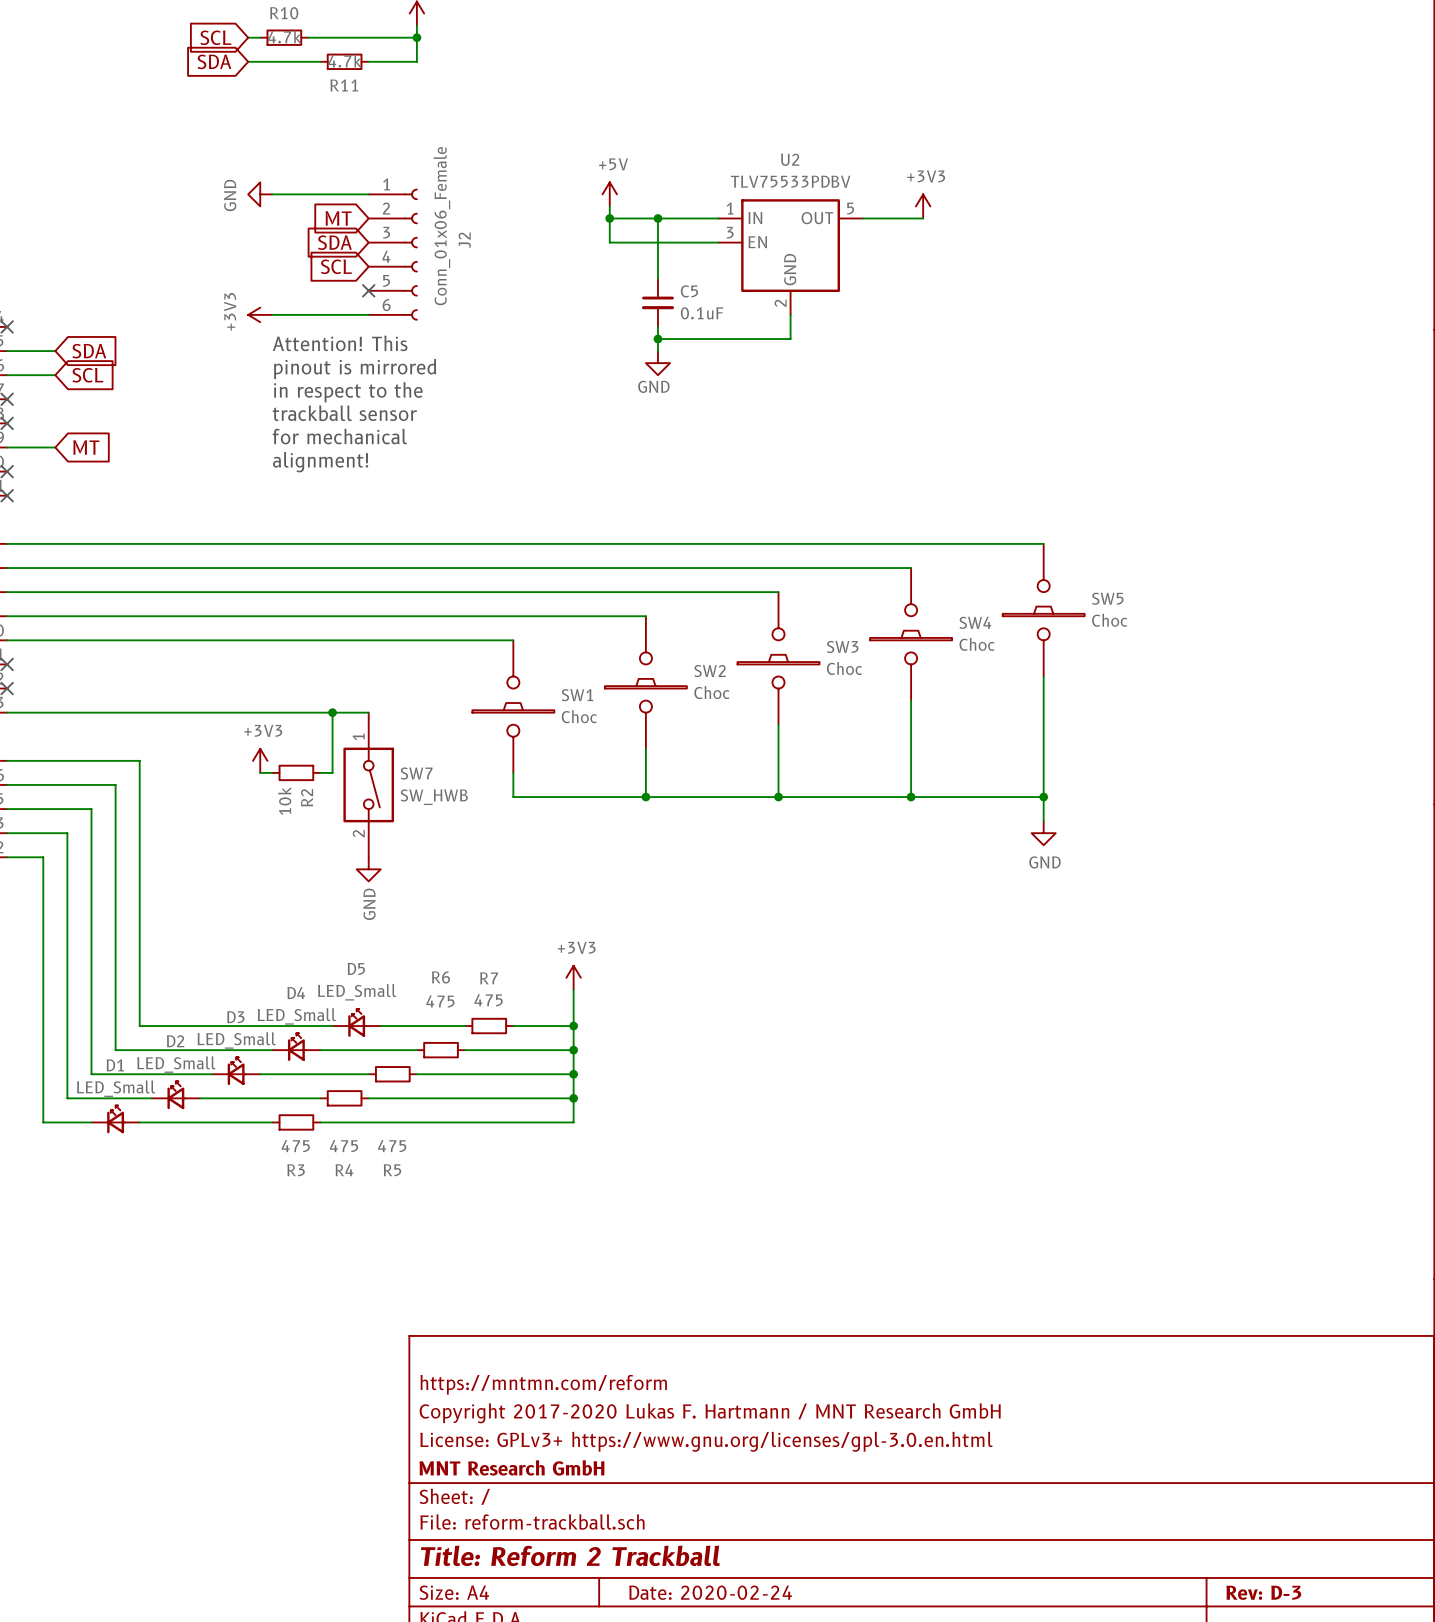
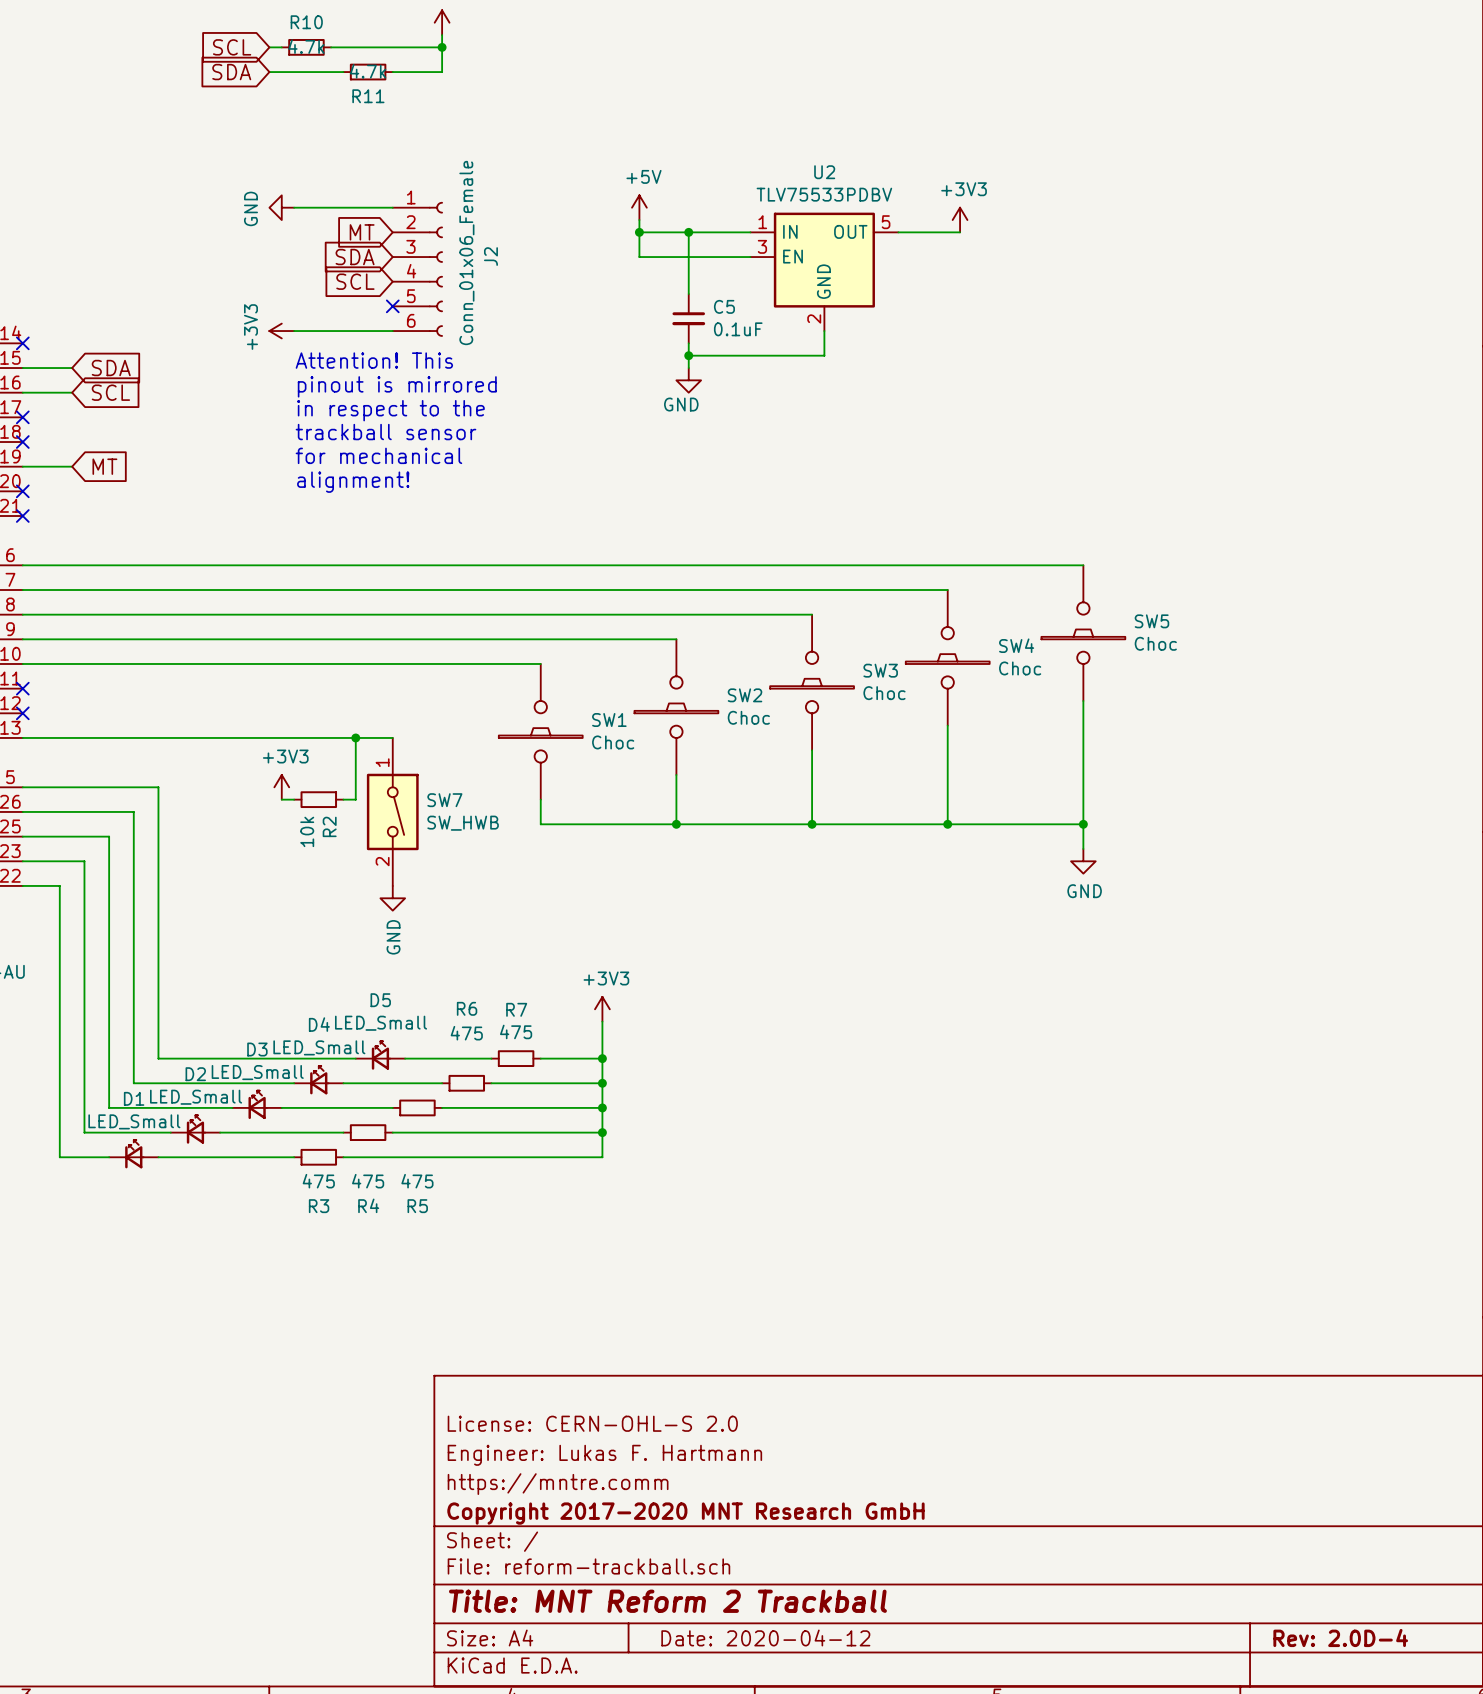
title block: https://mntmn.com/reform (543, 1384) -> License: CERN-OHL-S 2.0 (592, 1423)
title block: Copyright 2017-2020 Lukas F. Hartmann / MNT Research GmbH (710, 1413) -> Engineer: Lukas F. Hartmann (604, 1455)
title block: License: GPLv3+ https://www.gnu.org/licenses/gpl-3.0.en.html (706, 1441) -> https://mntre.comm (558, 1484)
title block: MNT Research GmbH (511, 1467) -> Copyright 2017-2020 MNT Research GmbH (685, 1513)
title block: Title: Reform 2 Trackball (570, 1555) -> Title: MNT Reform 2 Trackball (667, 1601)
title block: Date: 2020-02-24 (710, 1592) -> Date: 2020-04-12 (765, 1637)
title block: Rev: D-3 (1263, 1592) -> Rev: 2.0D-4 (1340, 1637)

